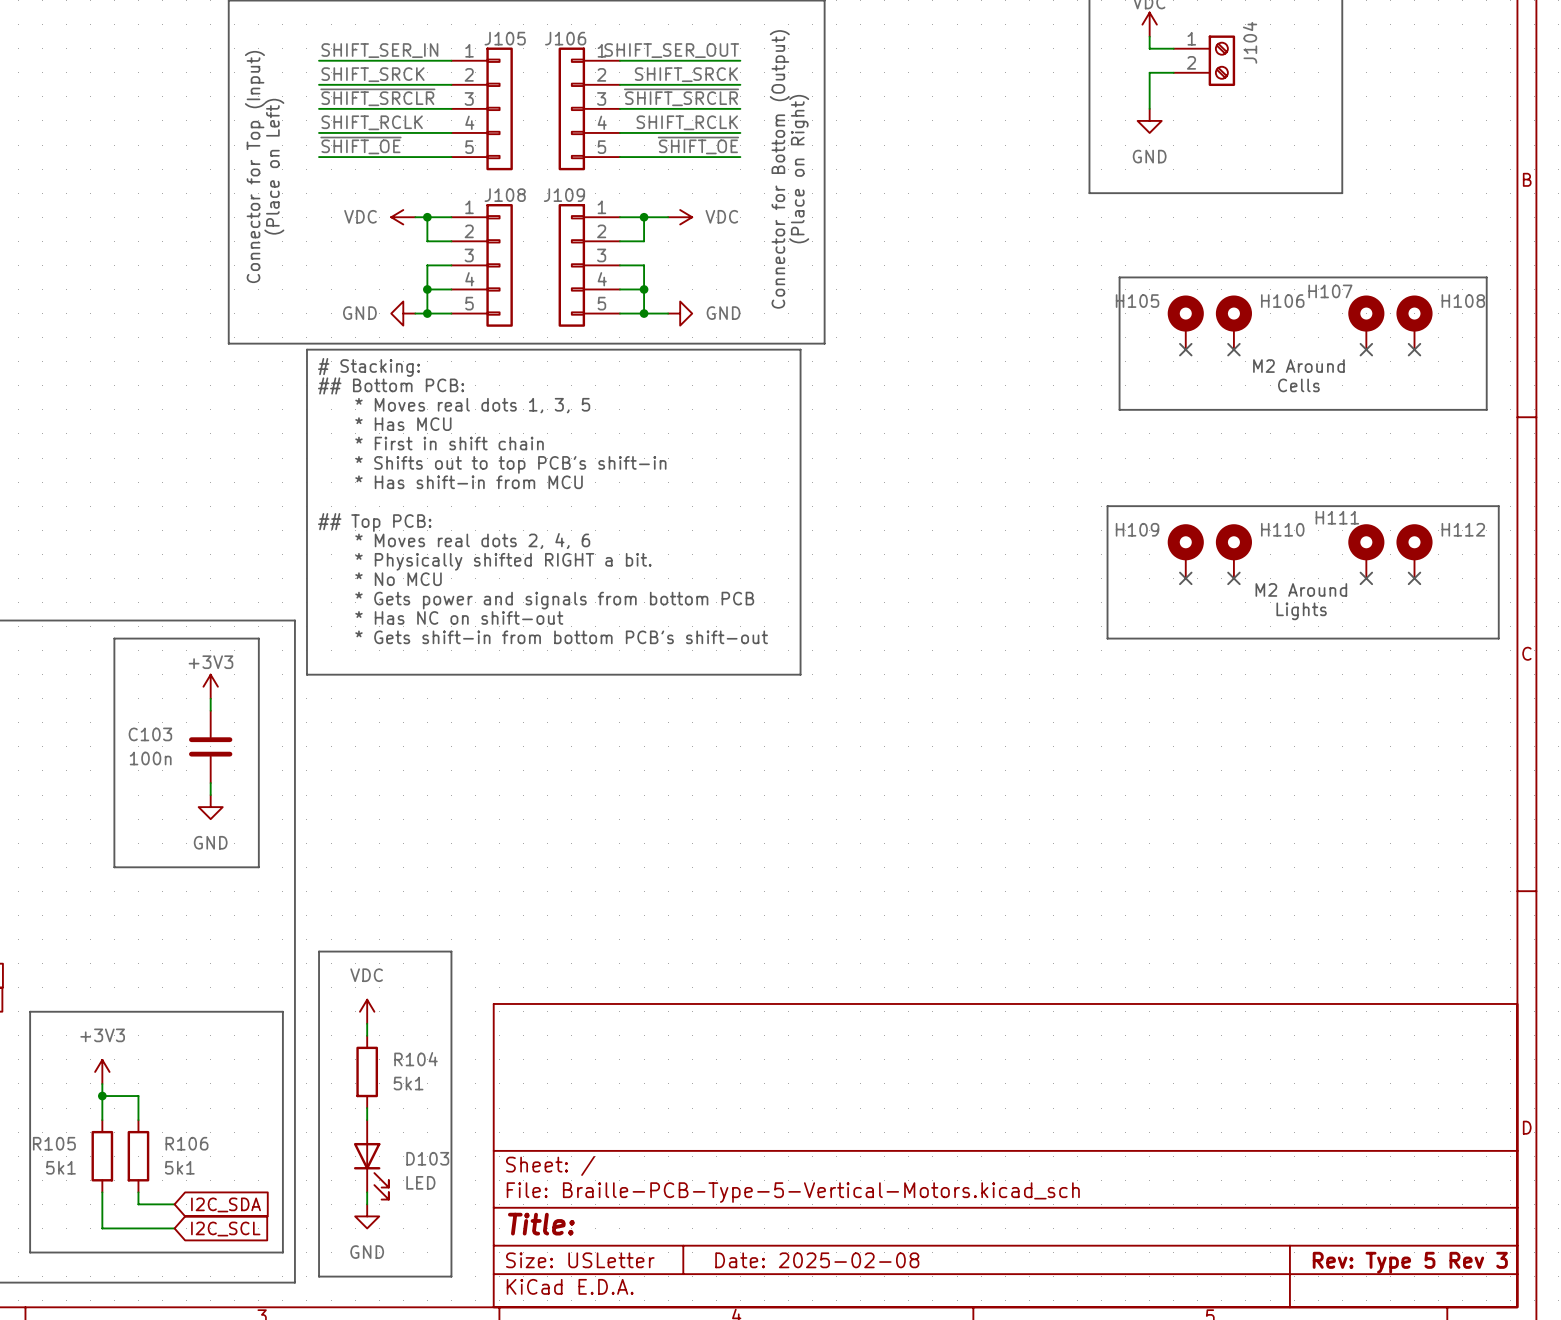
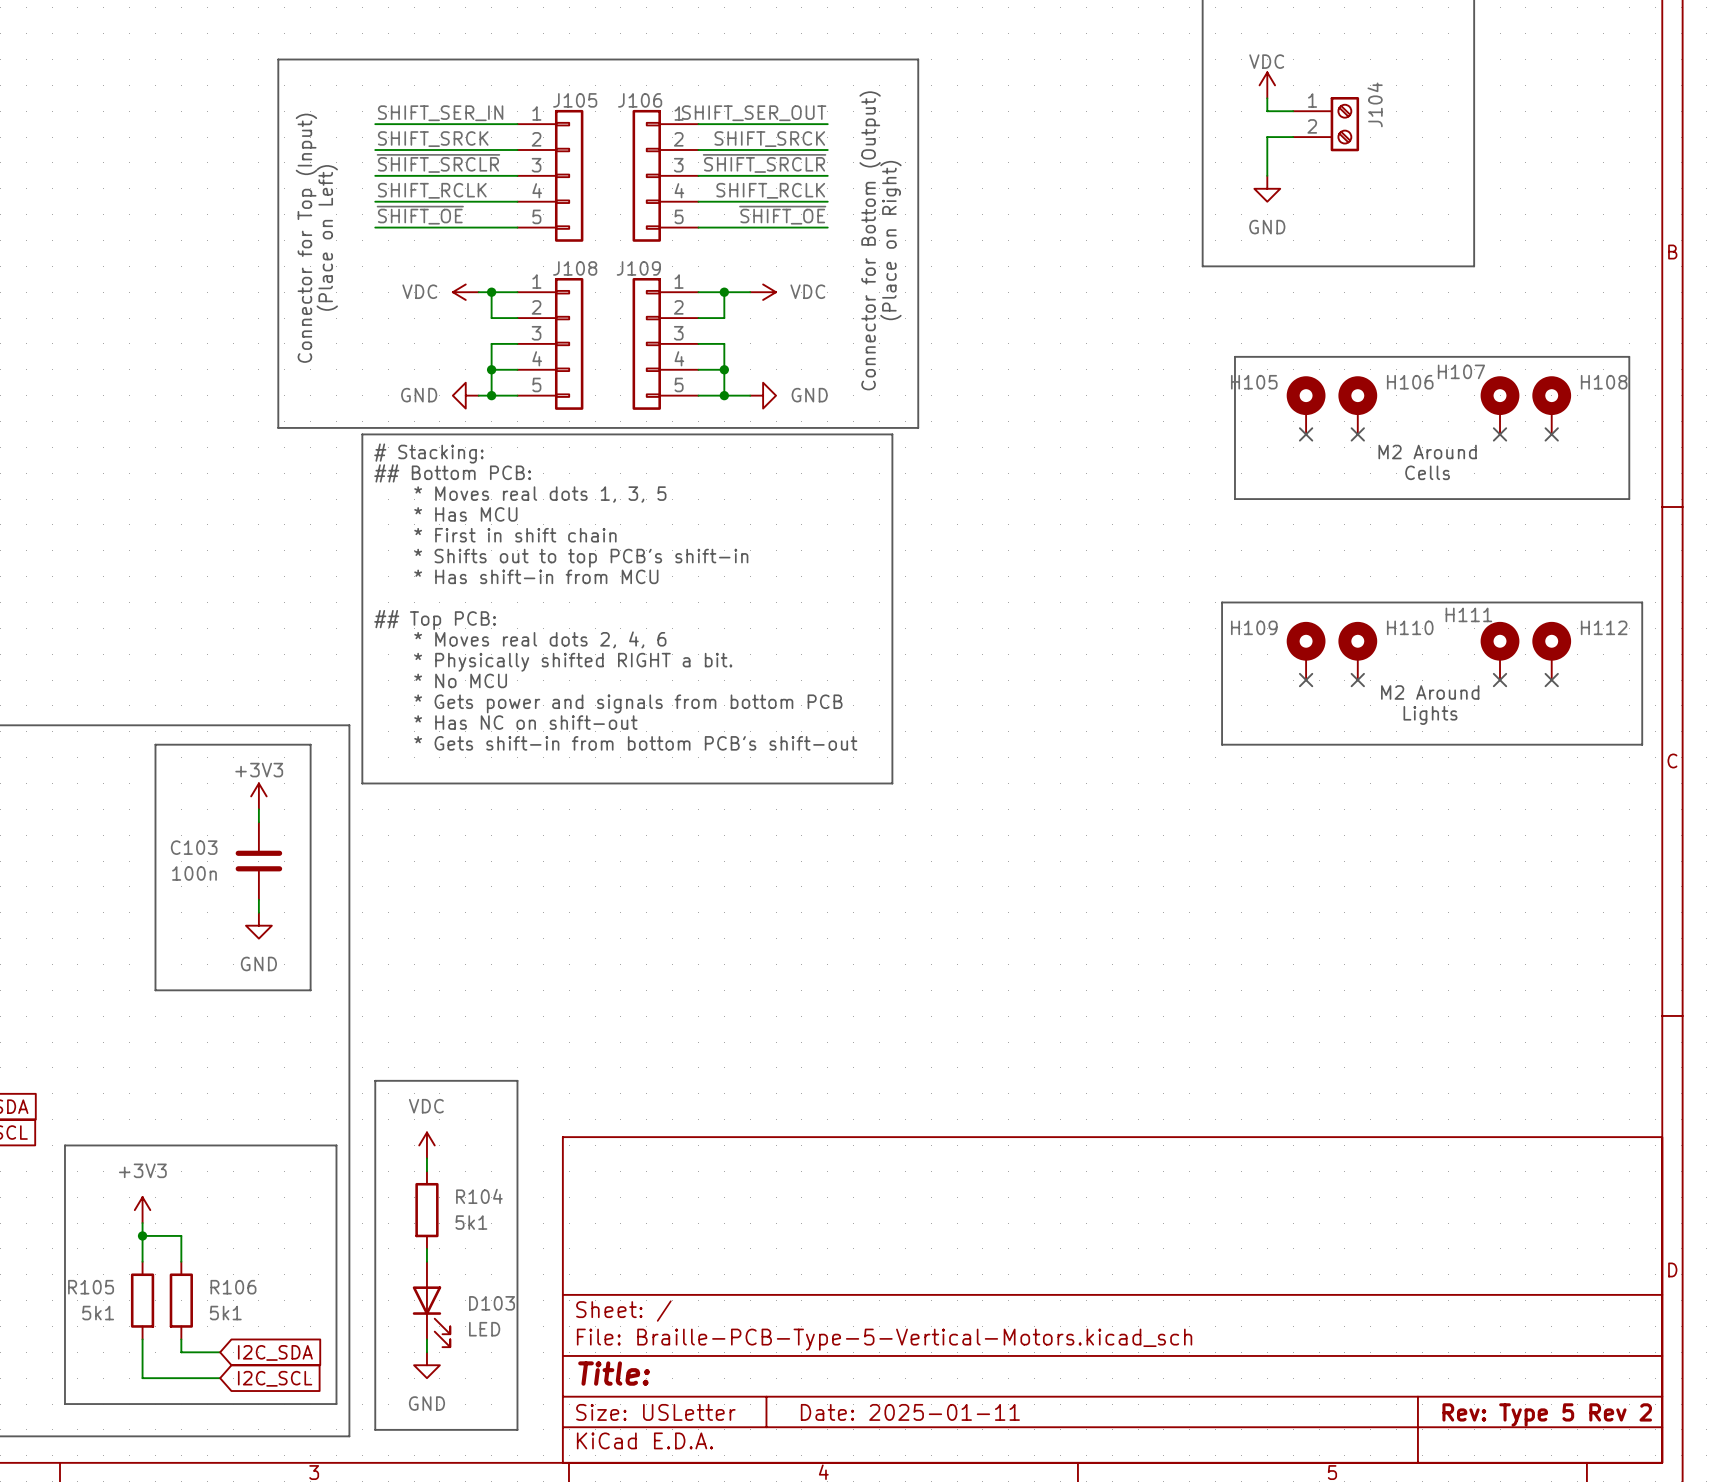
title block: Date: 2025-02-08 (817, 1260) -> Date: 2025-01-11 (910, 1412)
title block: Rev: Type 5 Rev 3 (1410, 1262) -> Rev: Type 5 Rev 2 (1547, 1414)

